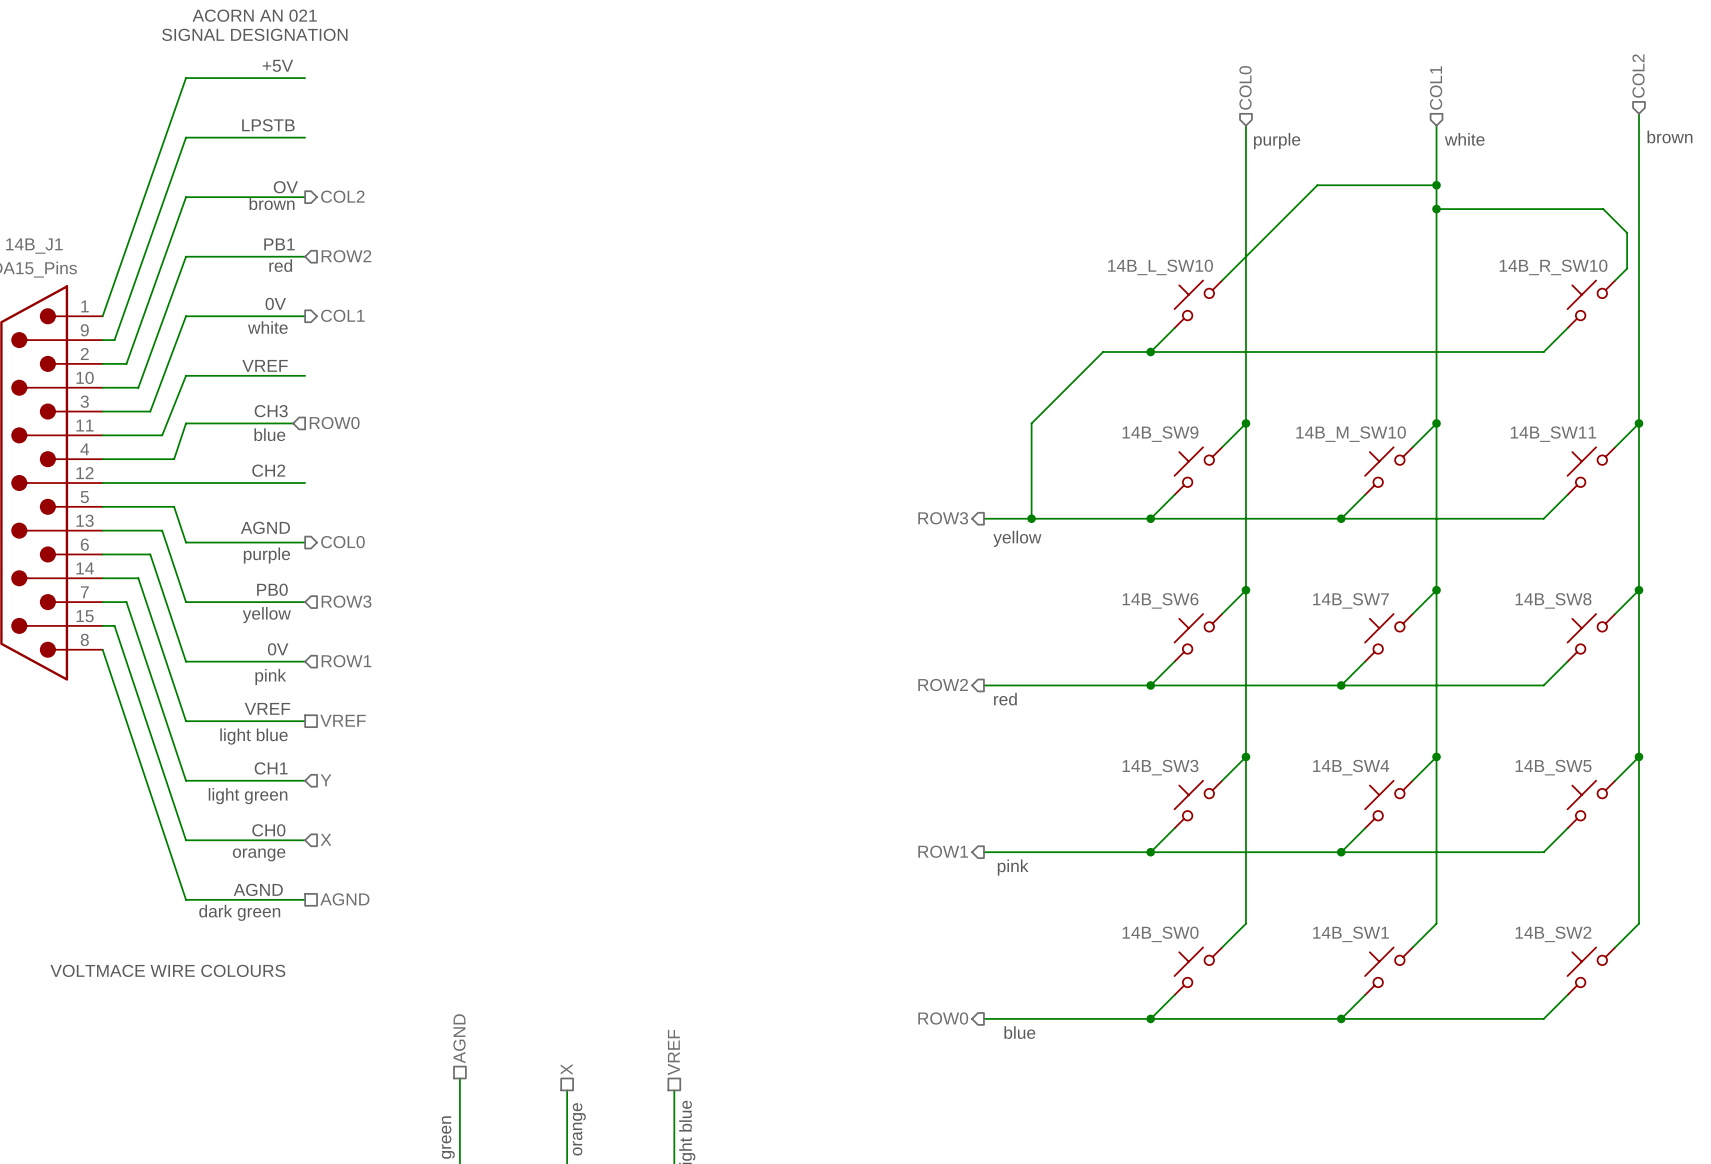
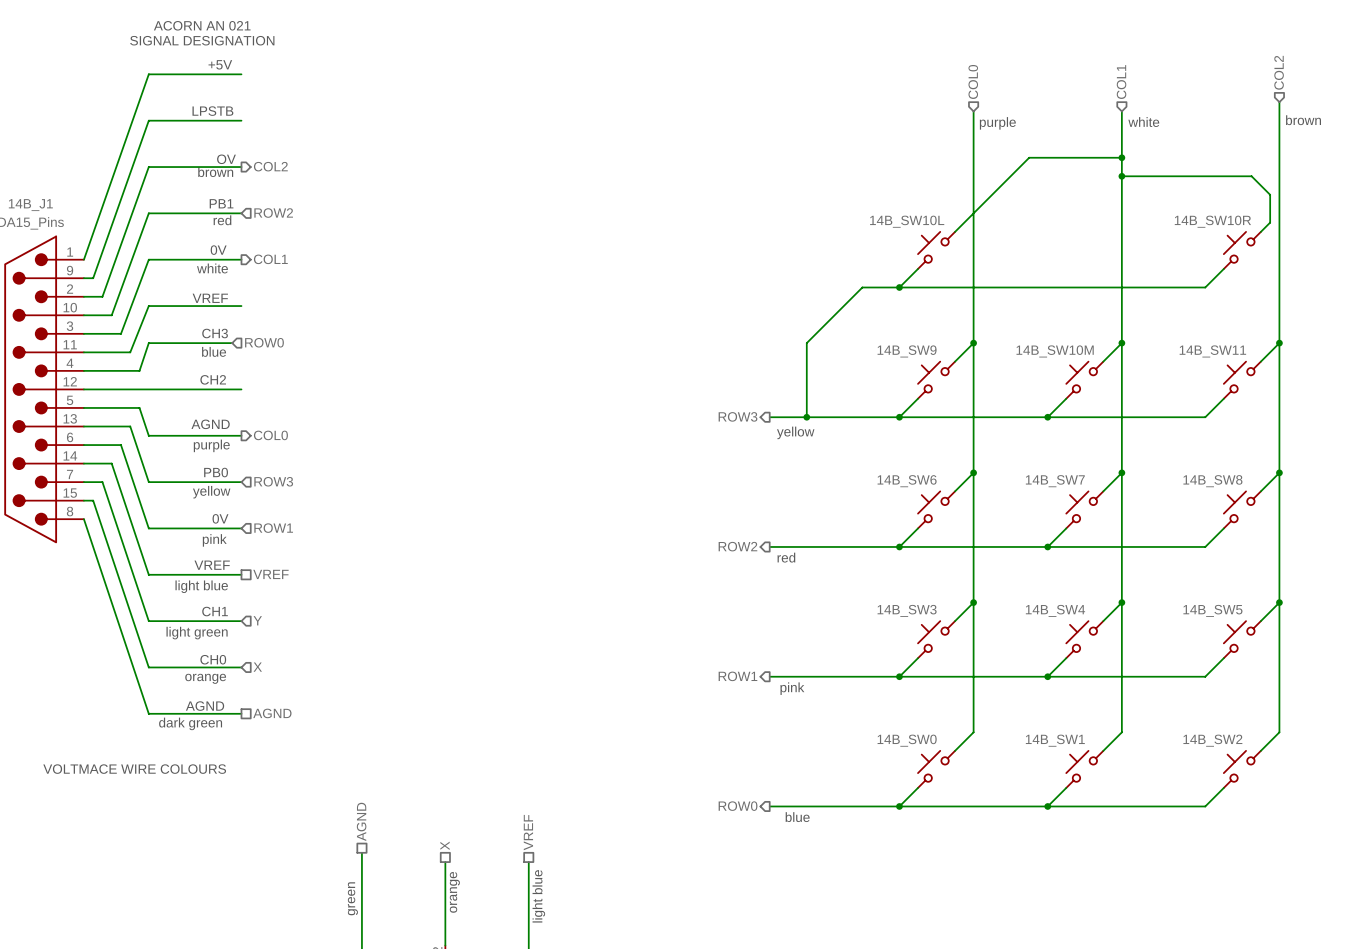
14B_L_SW10 name: 14B_L_SW10 (1160, 267) -> 14B_SW10L (907, 221)
14B_R_SW10 name: 14B_R_SW10 (1553, 267) -> 14B_SW10R (1212, 221)
14B_M_SW10 name: 14B_M_SW10 (1351, 434) -> 14B_SW10M (1055, 351)

